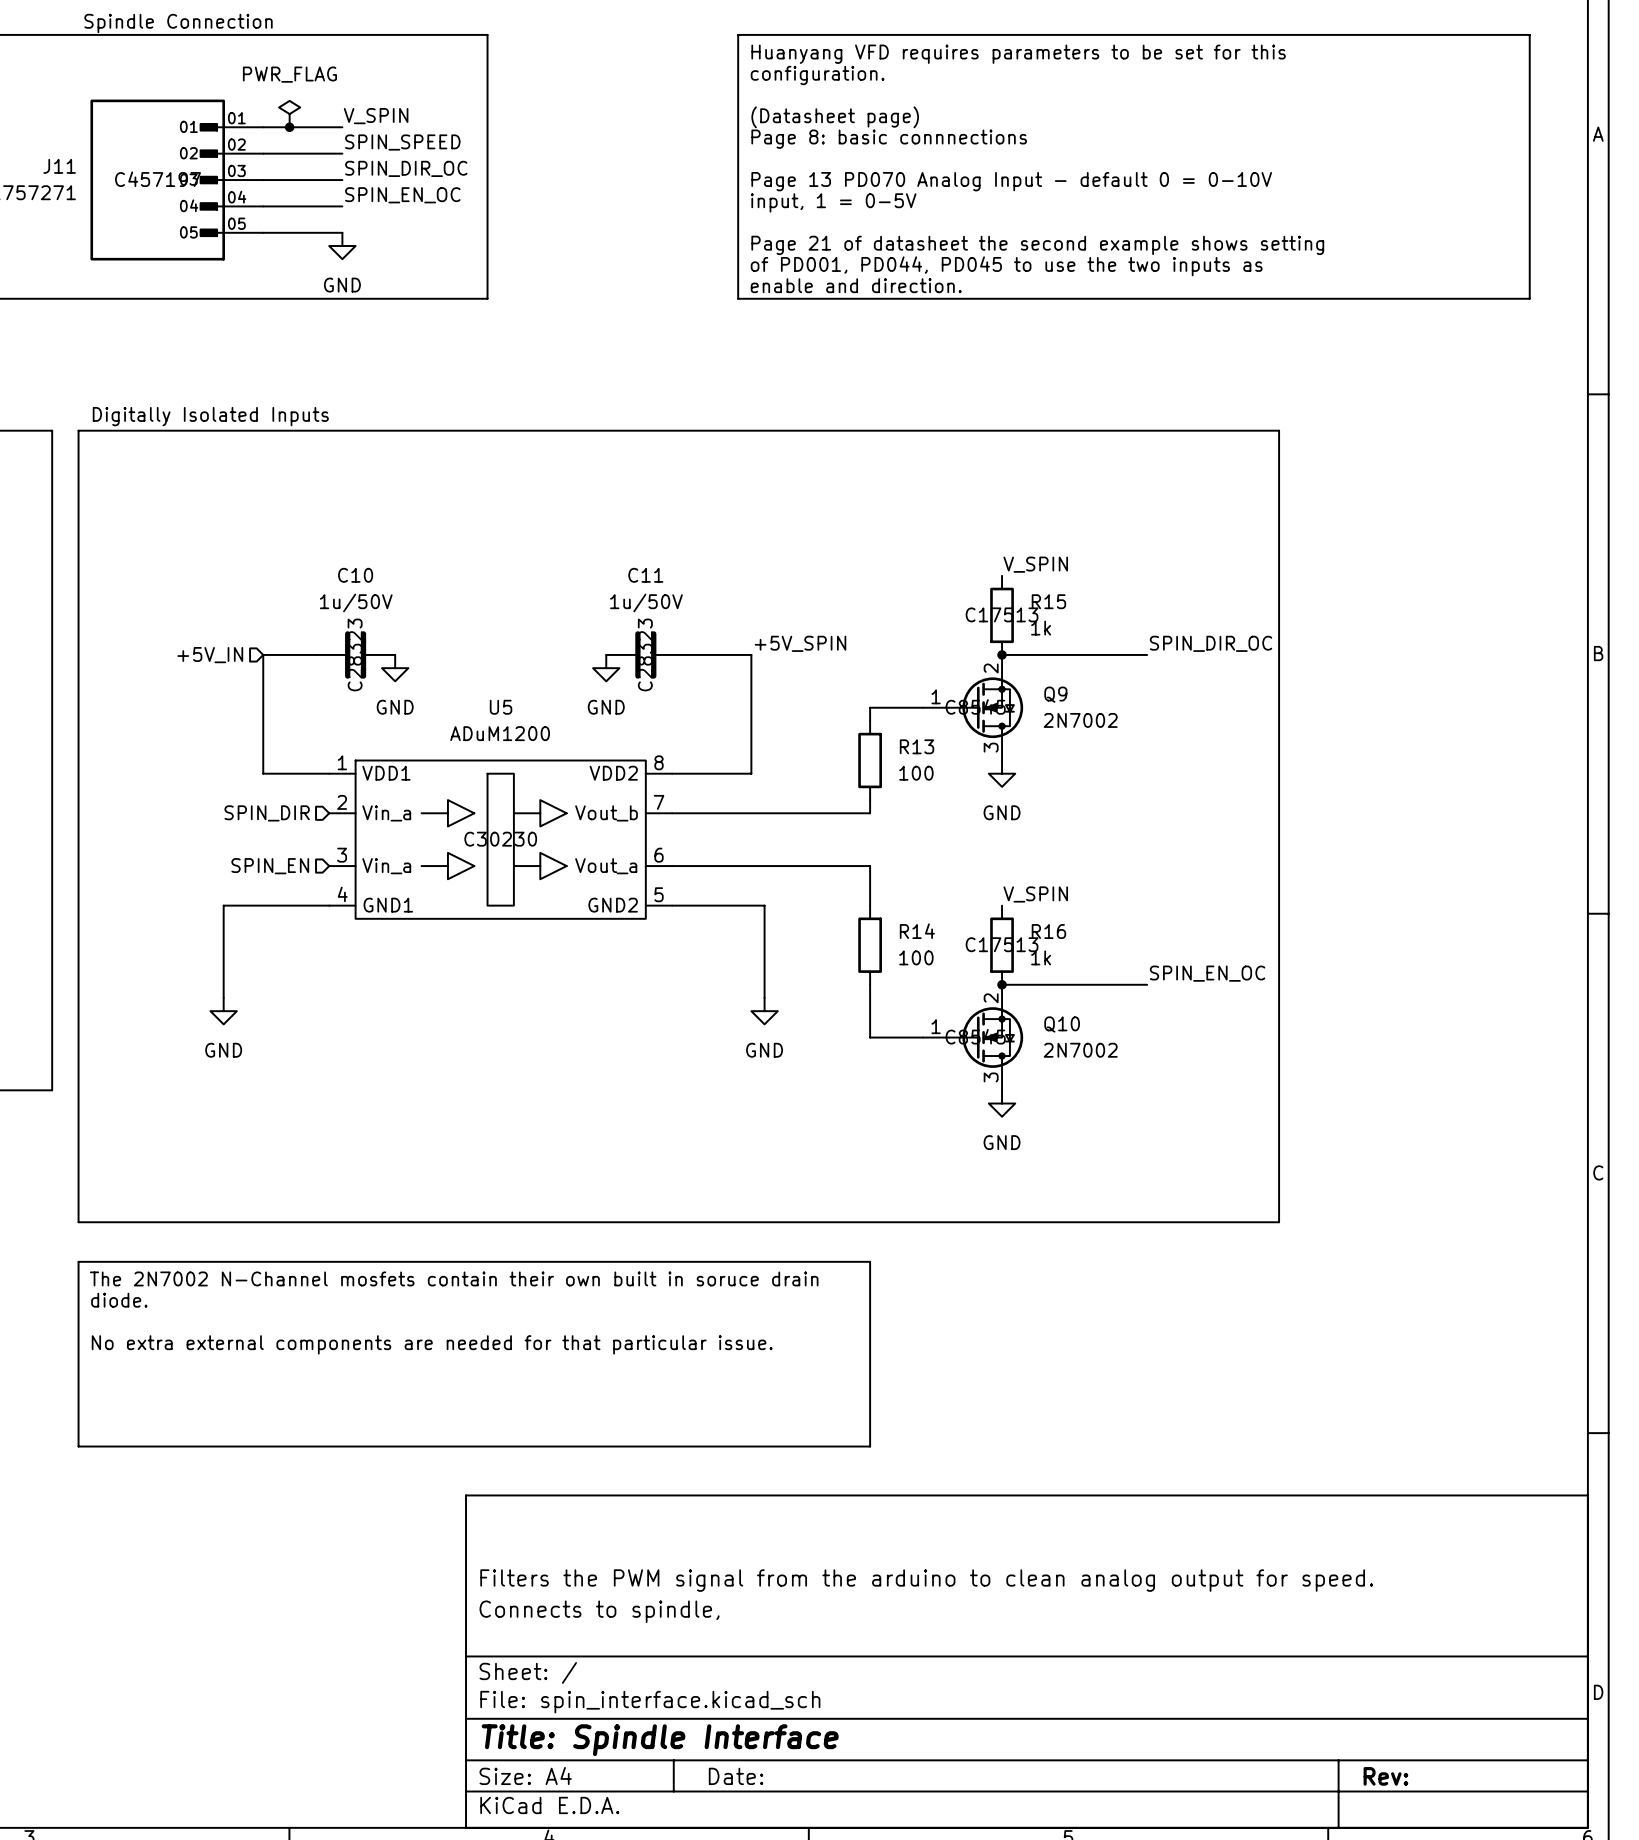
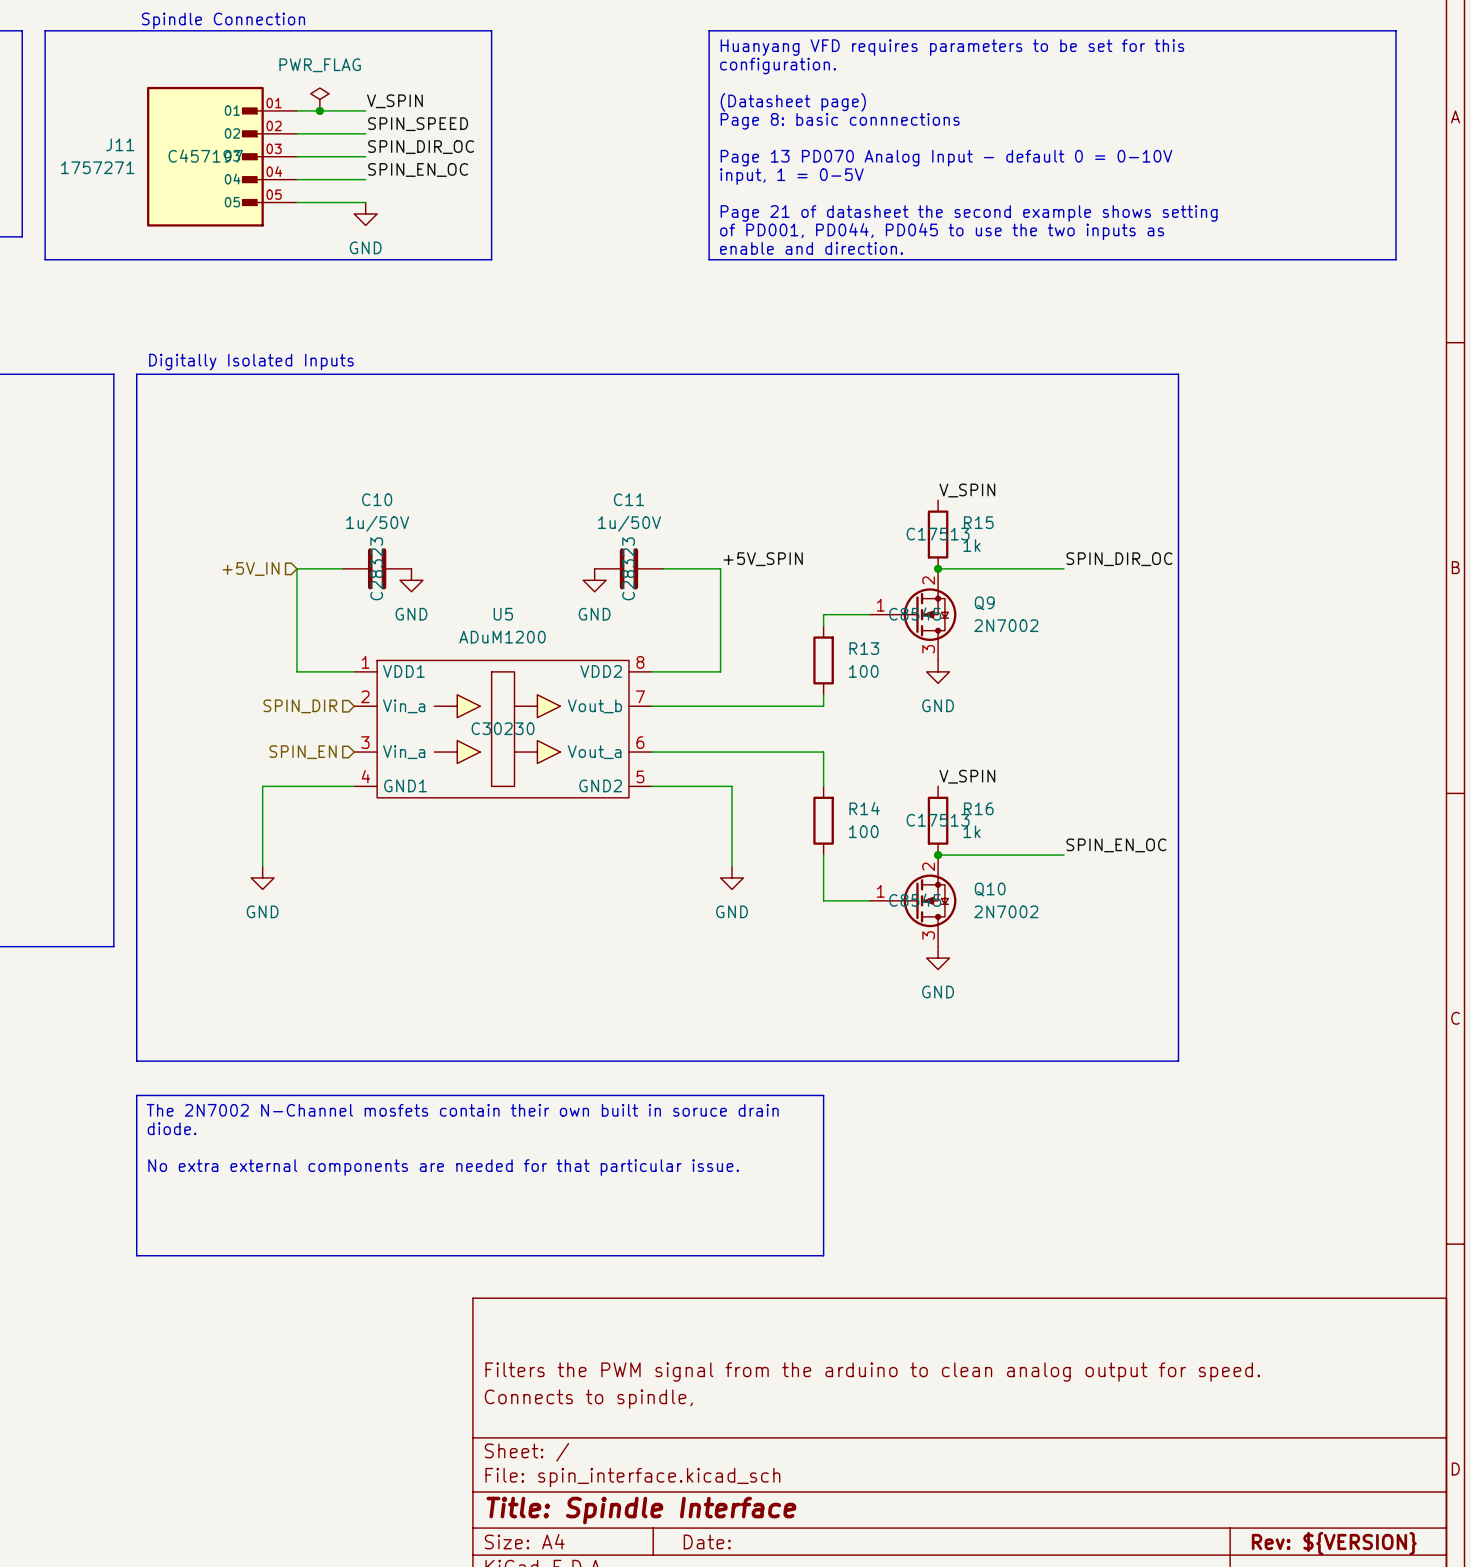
title block: Rev: (1385, 1776) -> Rev: ${VERSION} (1334, 1543)

